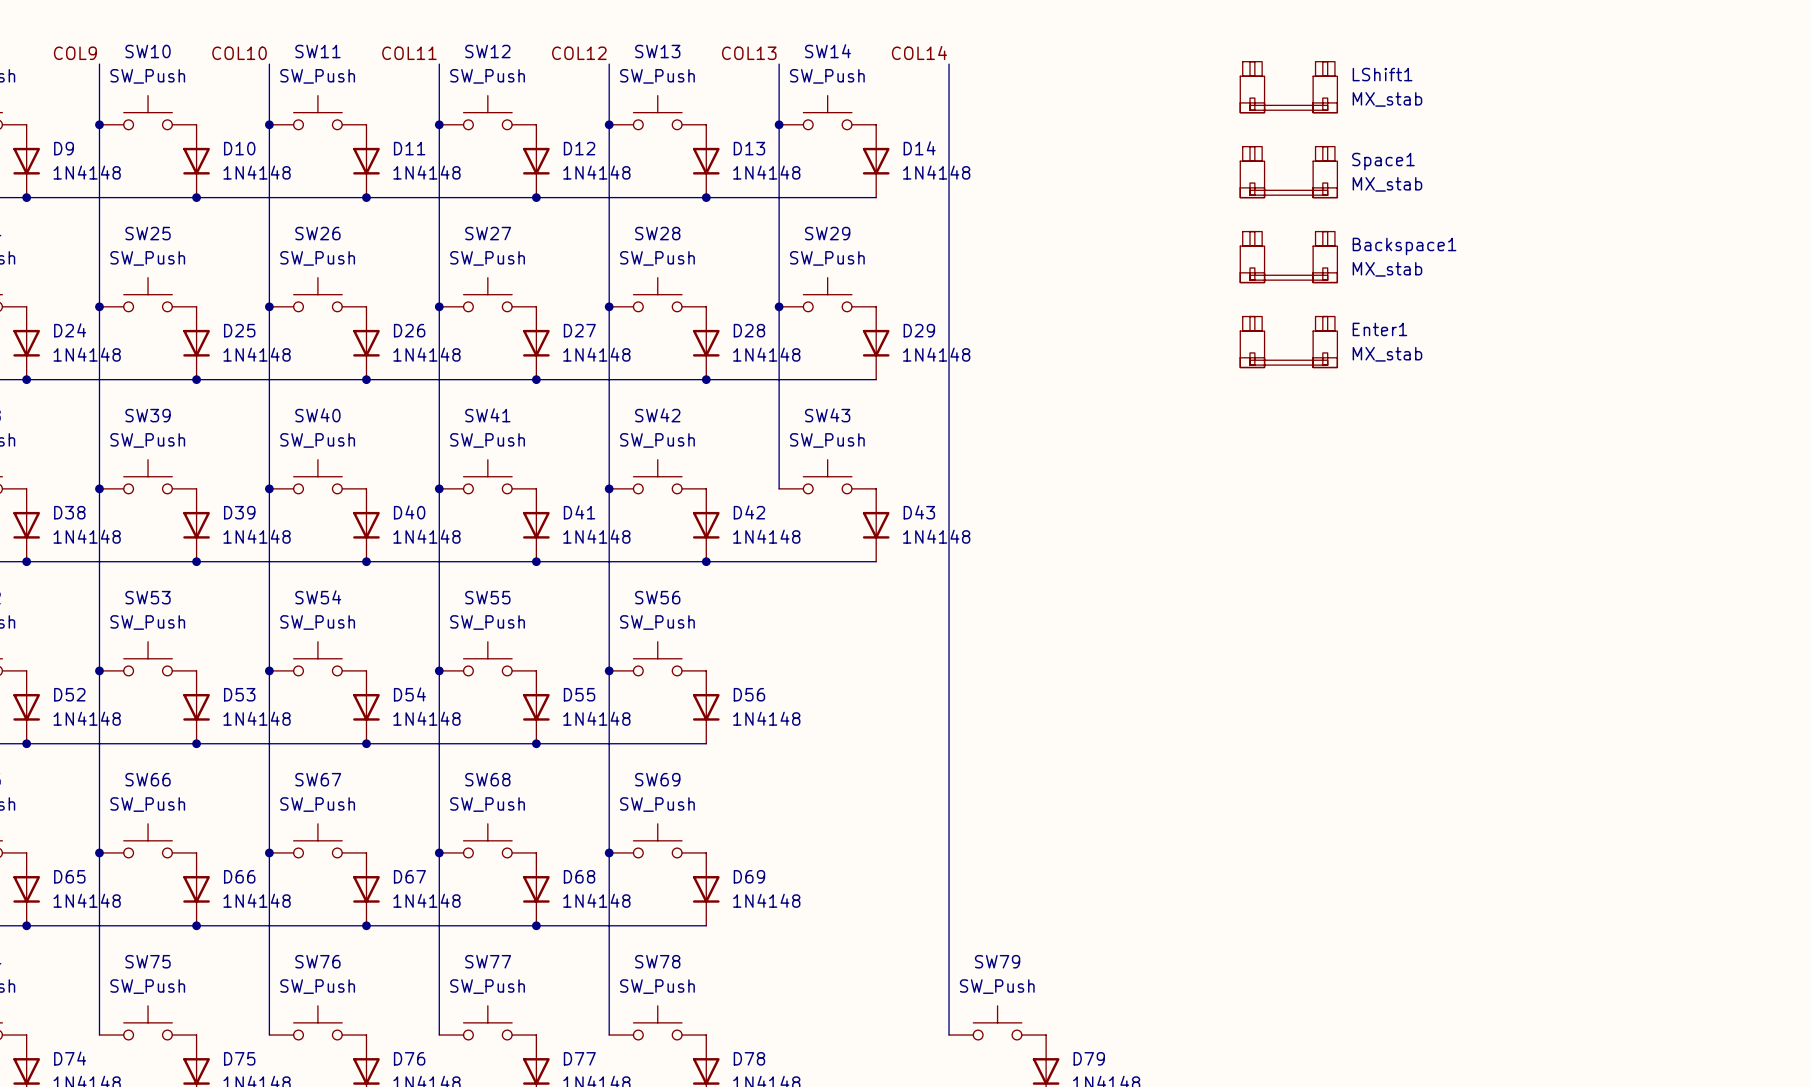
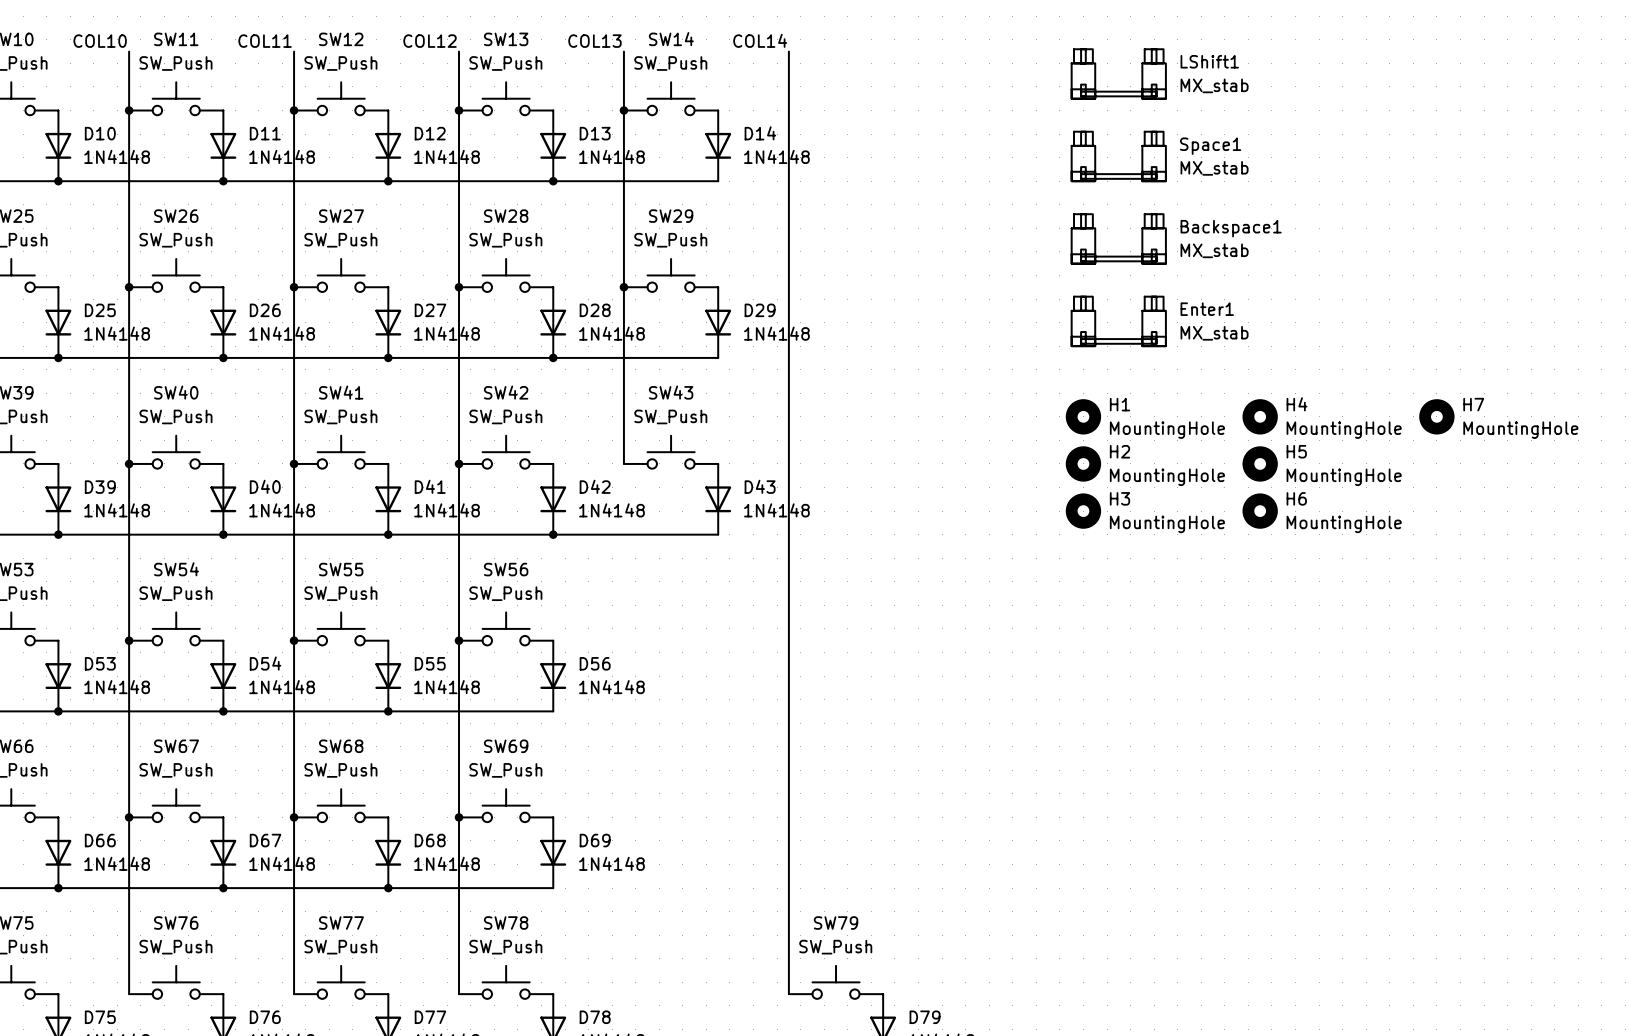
H1: none -> MountingHole (1083, 416)
H4: none -> MountingHole (1260, 416)
H7: none -> MountingHole (1436, 416)
H2: none -> MountingHole (1083, 463)
H5: none -> MountingHole (1260, 463)
H3: none -> MountingHole (1083, 511)
H6: none -> MountingHole (1260, 511)

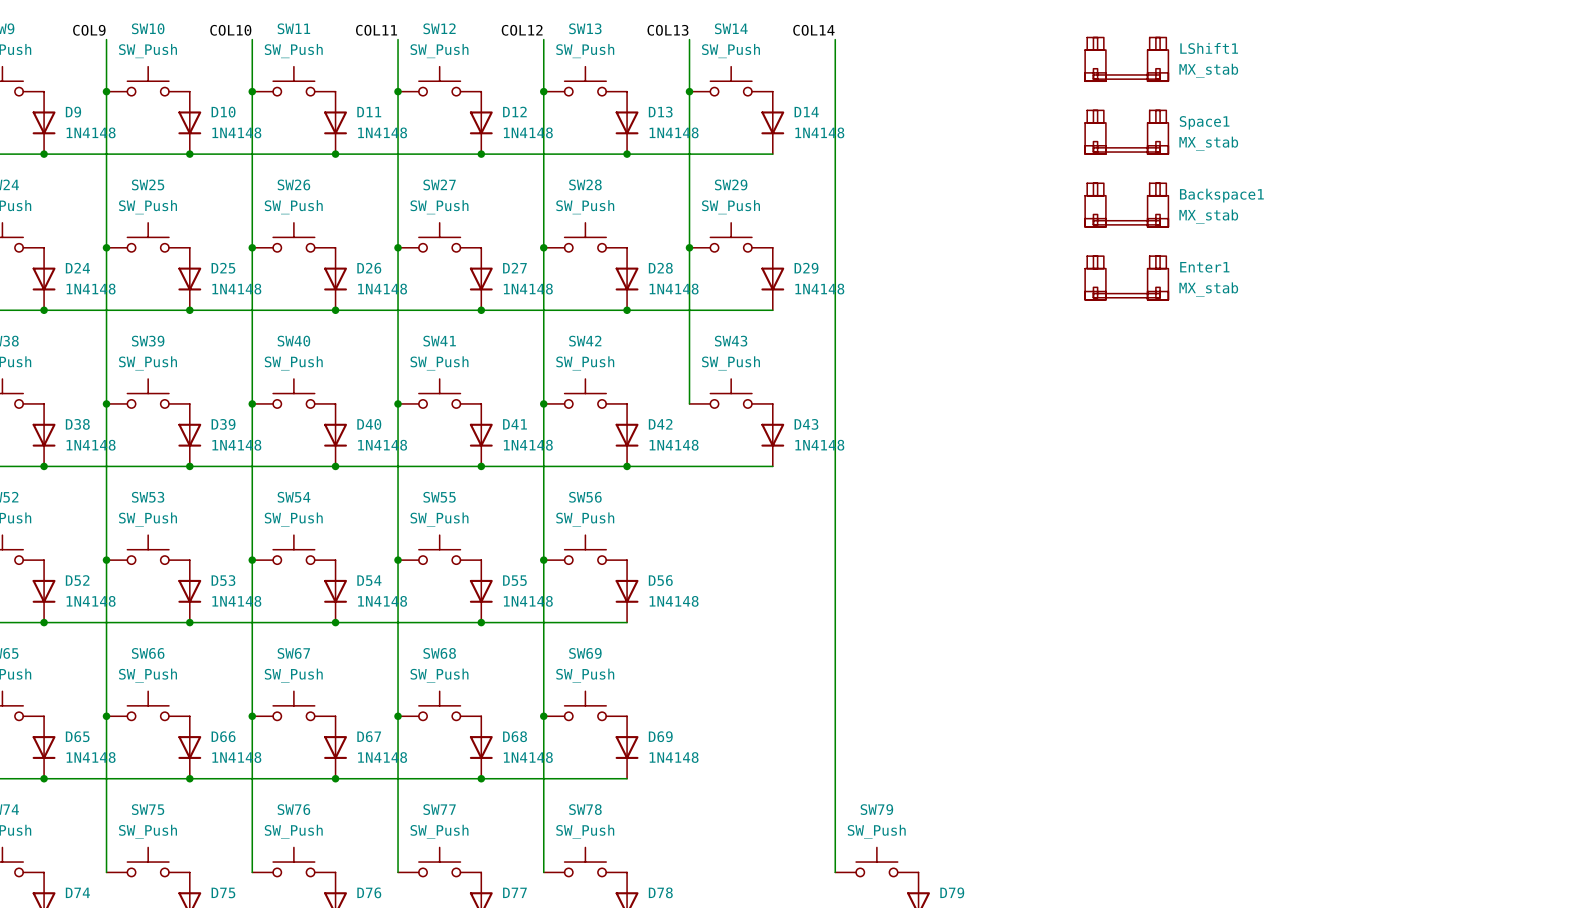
H1: MountingHole (1083, 416) -> none
H4: MountingHole (1260, 416) -> none
H7: MountingHole (1436, 416) -> none
H2: MountingHole (1083, 463) -> none
H5: MountingHole (1260, 463) -> none
H3: MountingHole (1083, 511) -> none
H6: MountingHole (1260, 511) -> none

